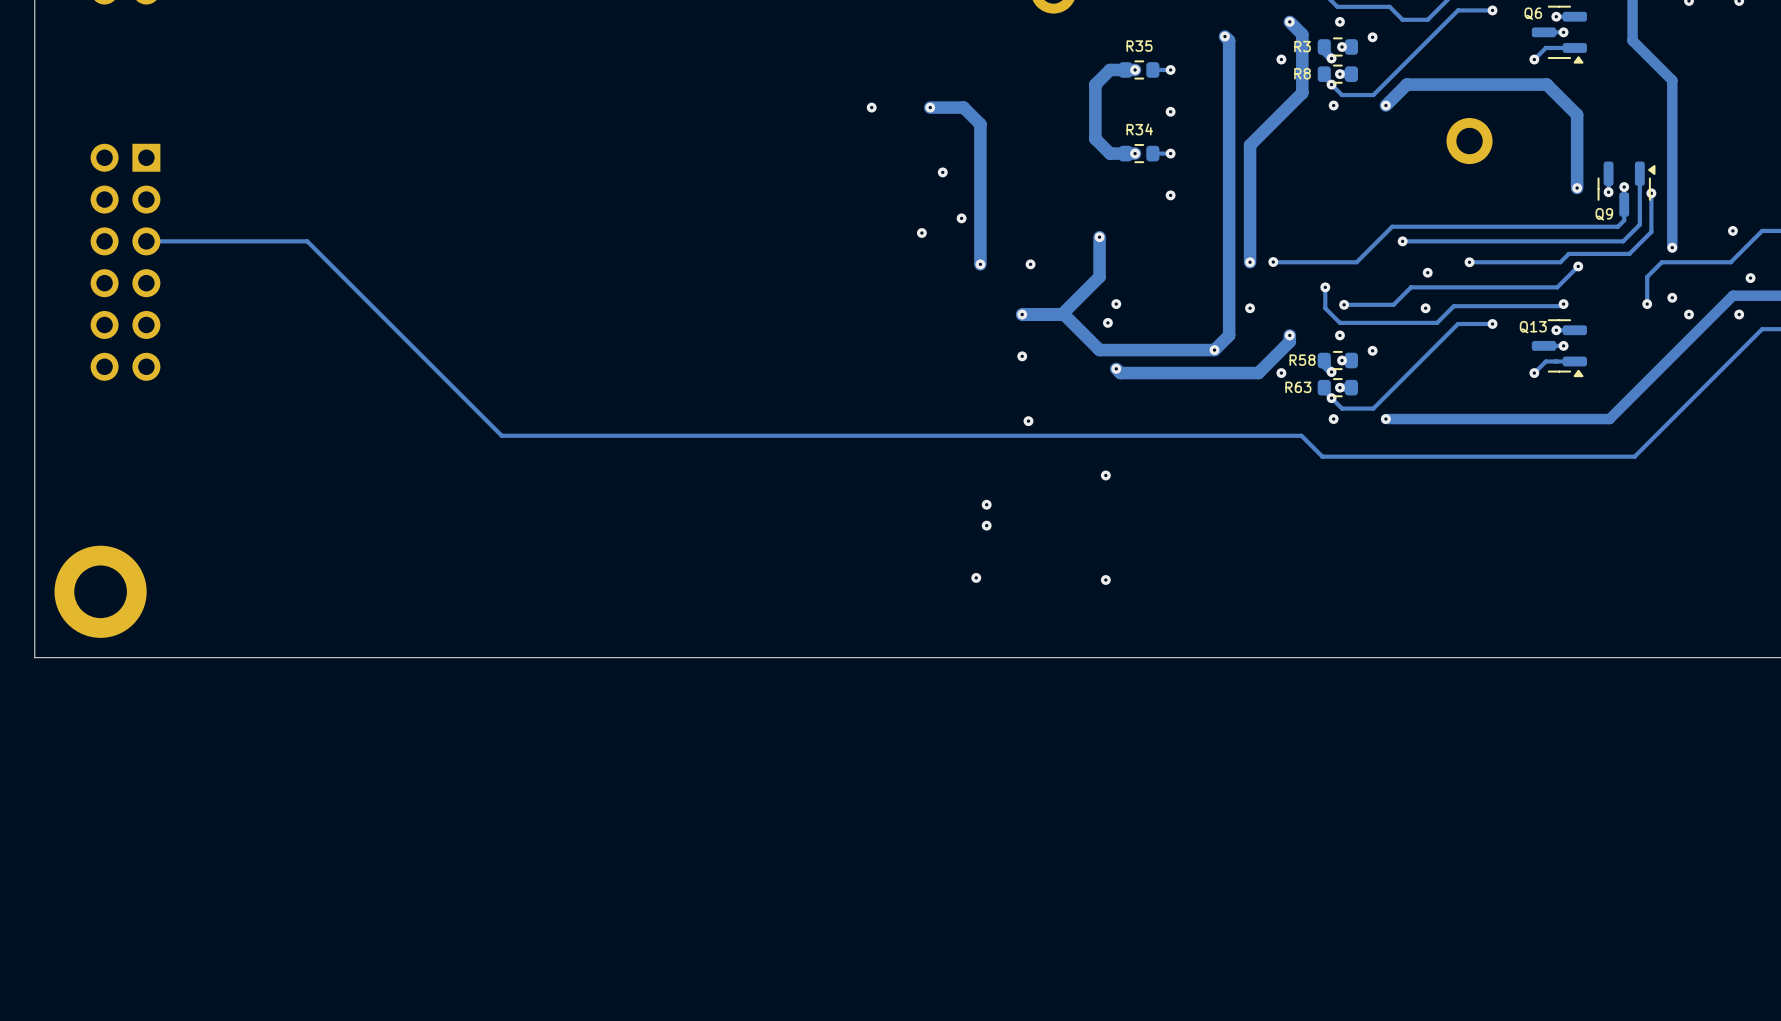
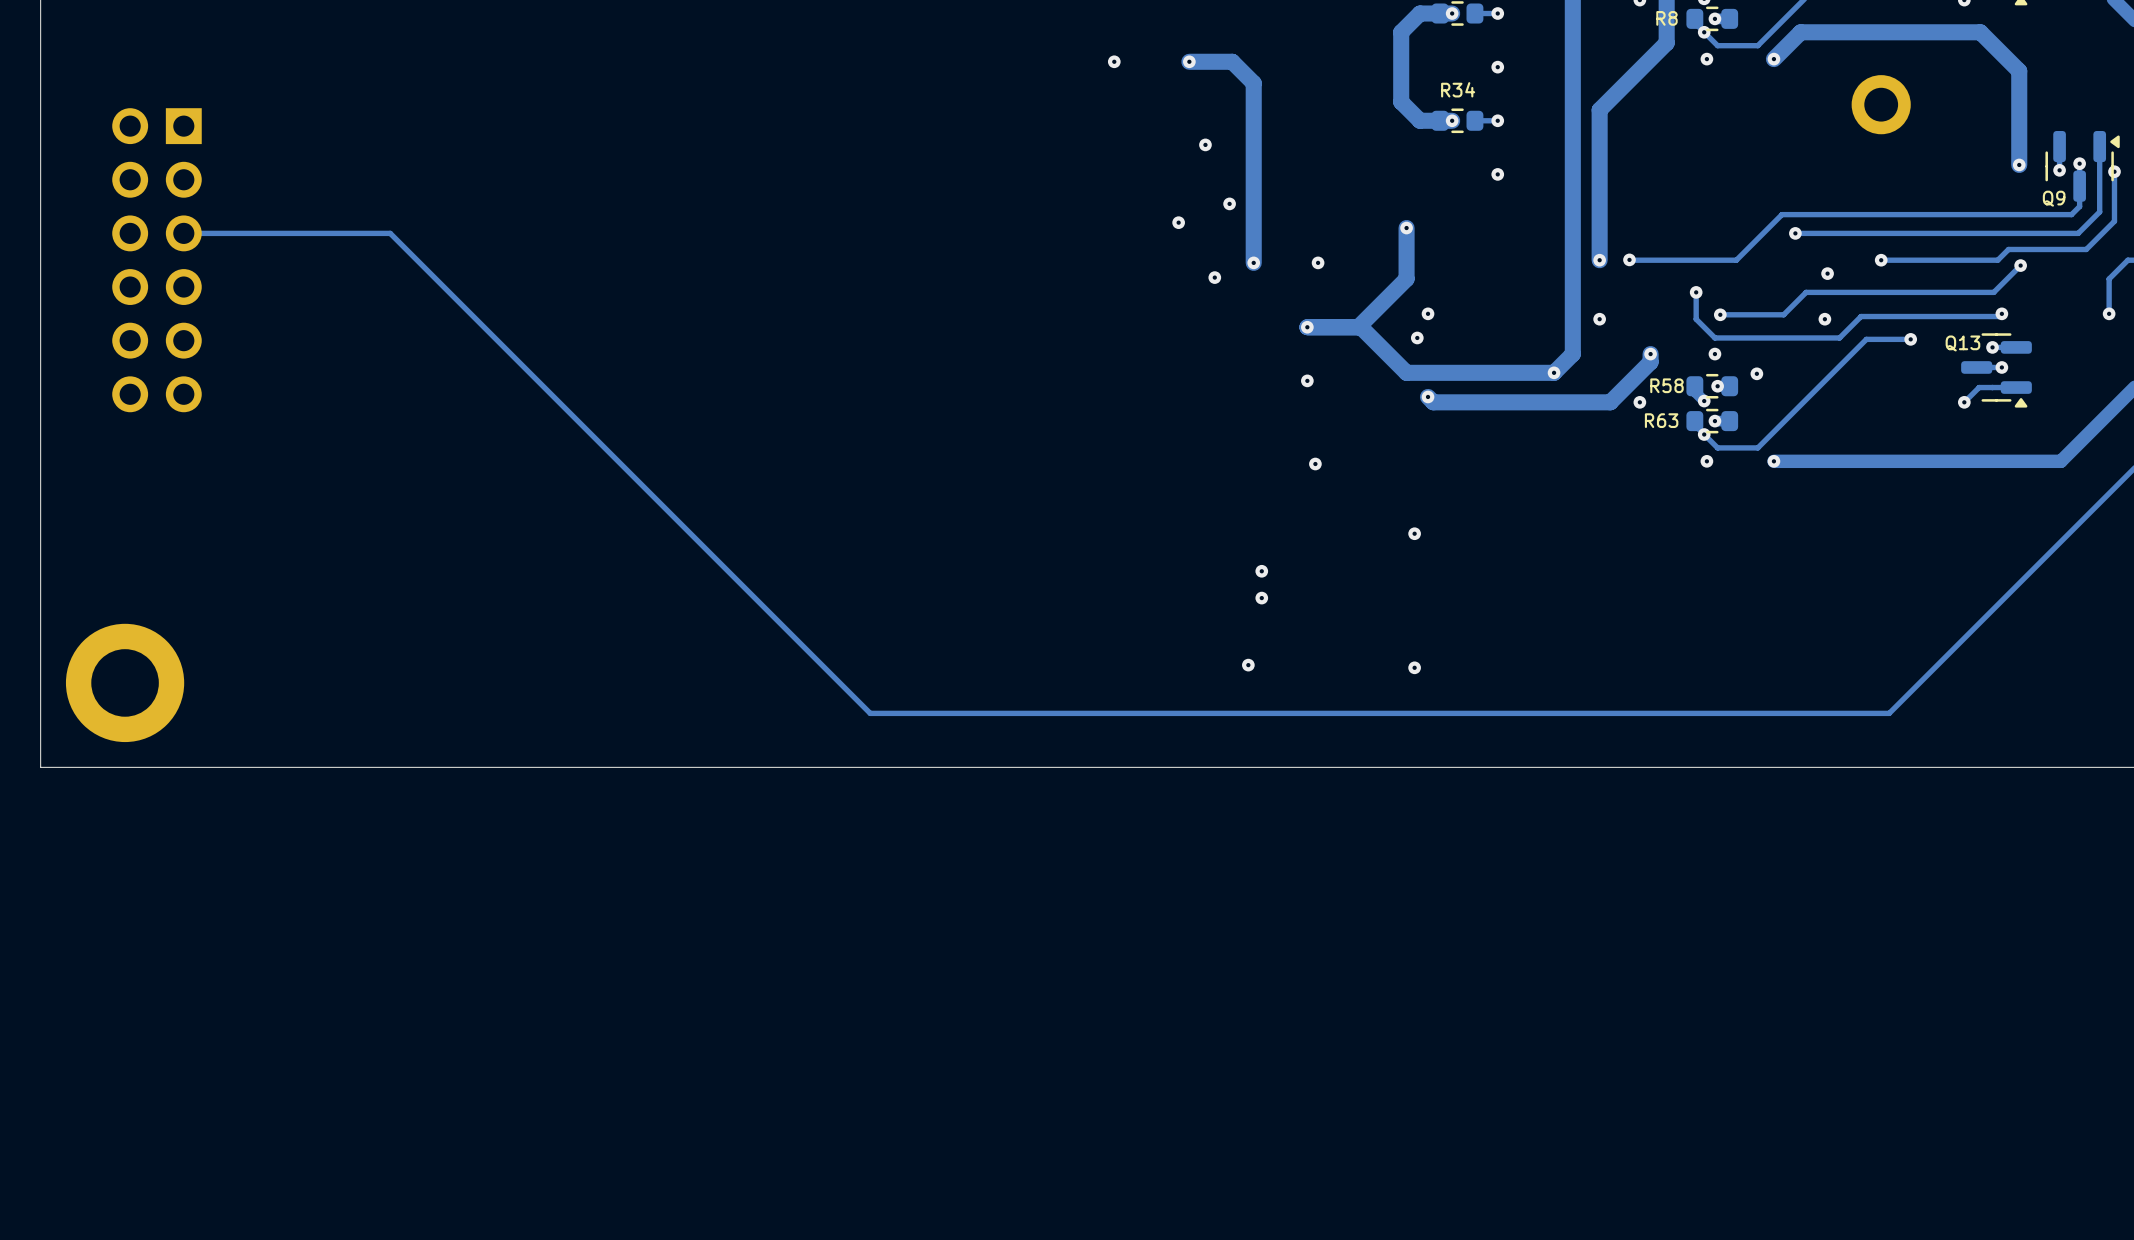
via: none -> (1214, 277)
track: (501, 435) (1301, 435) (1322, 456) (1634, 456) -> (639, 482) (870, 713) (1889, 713) (2093, 509)

